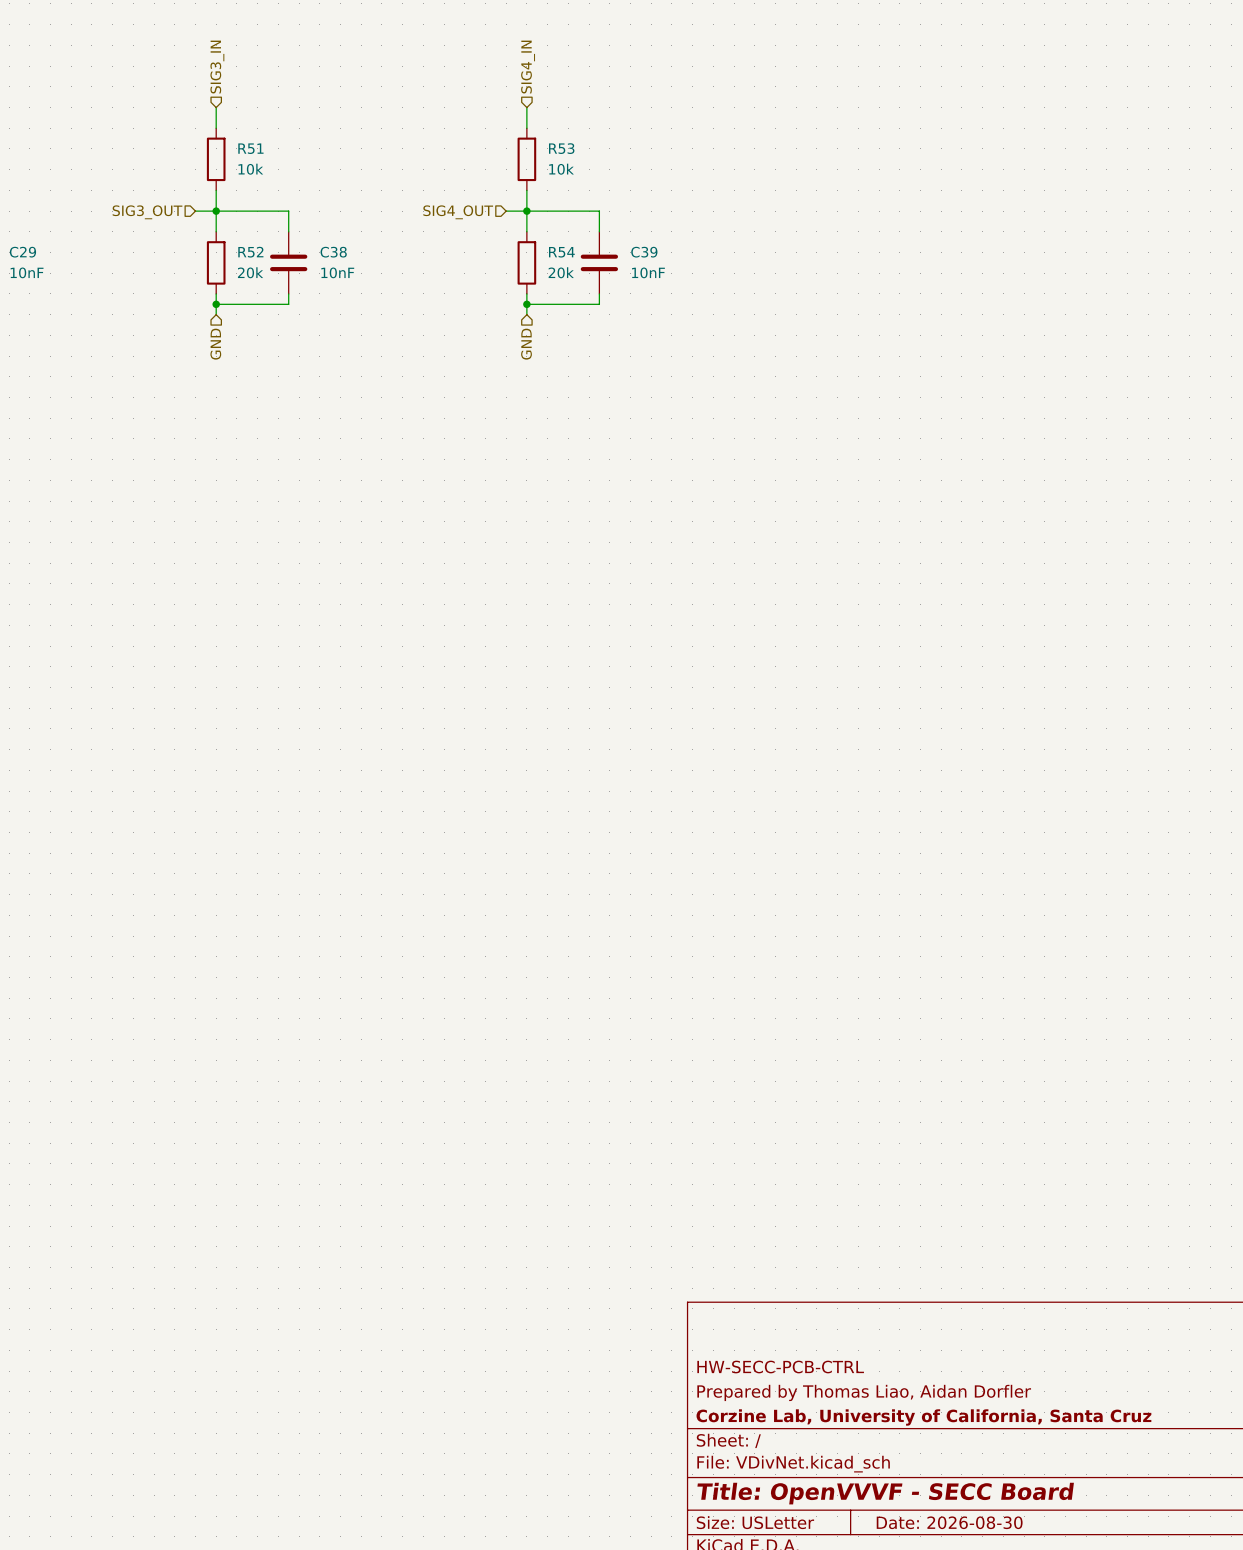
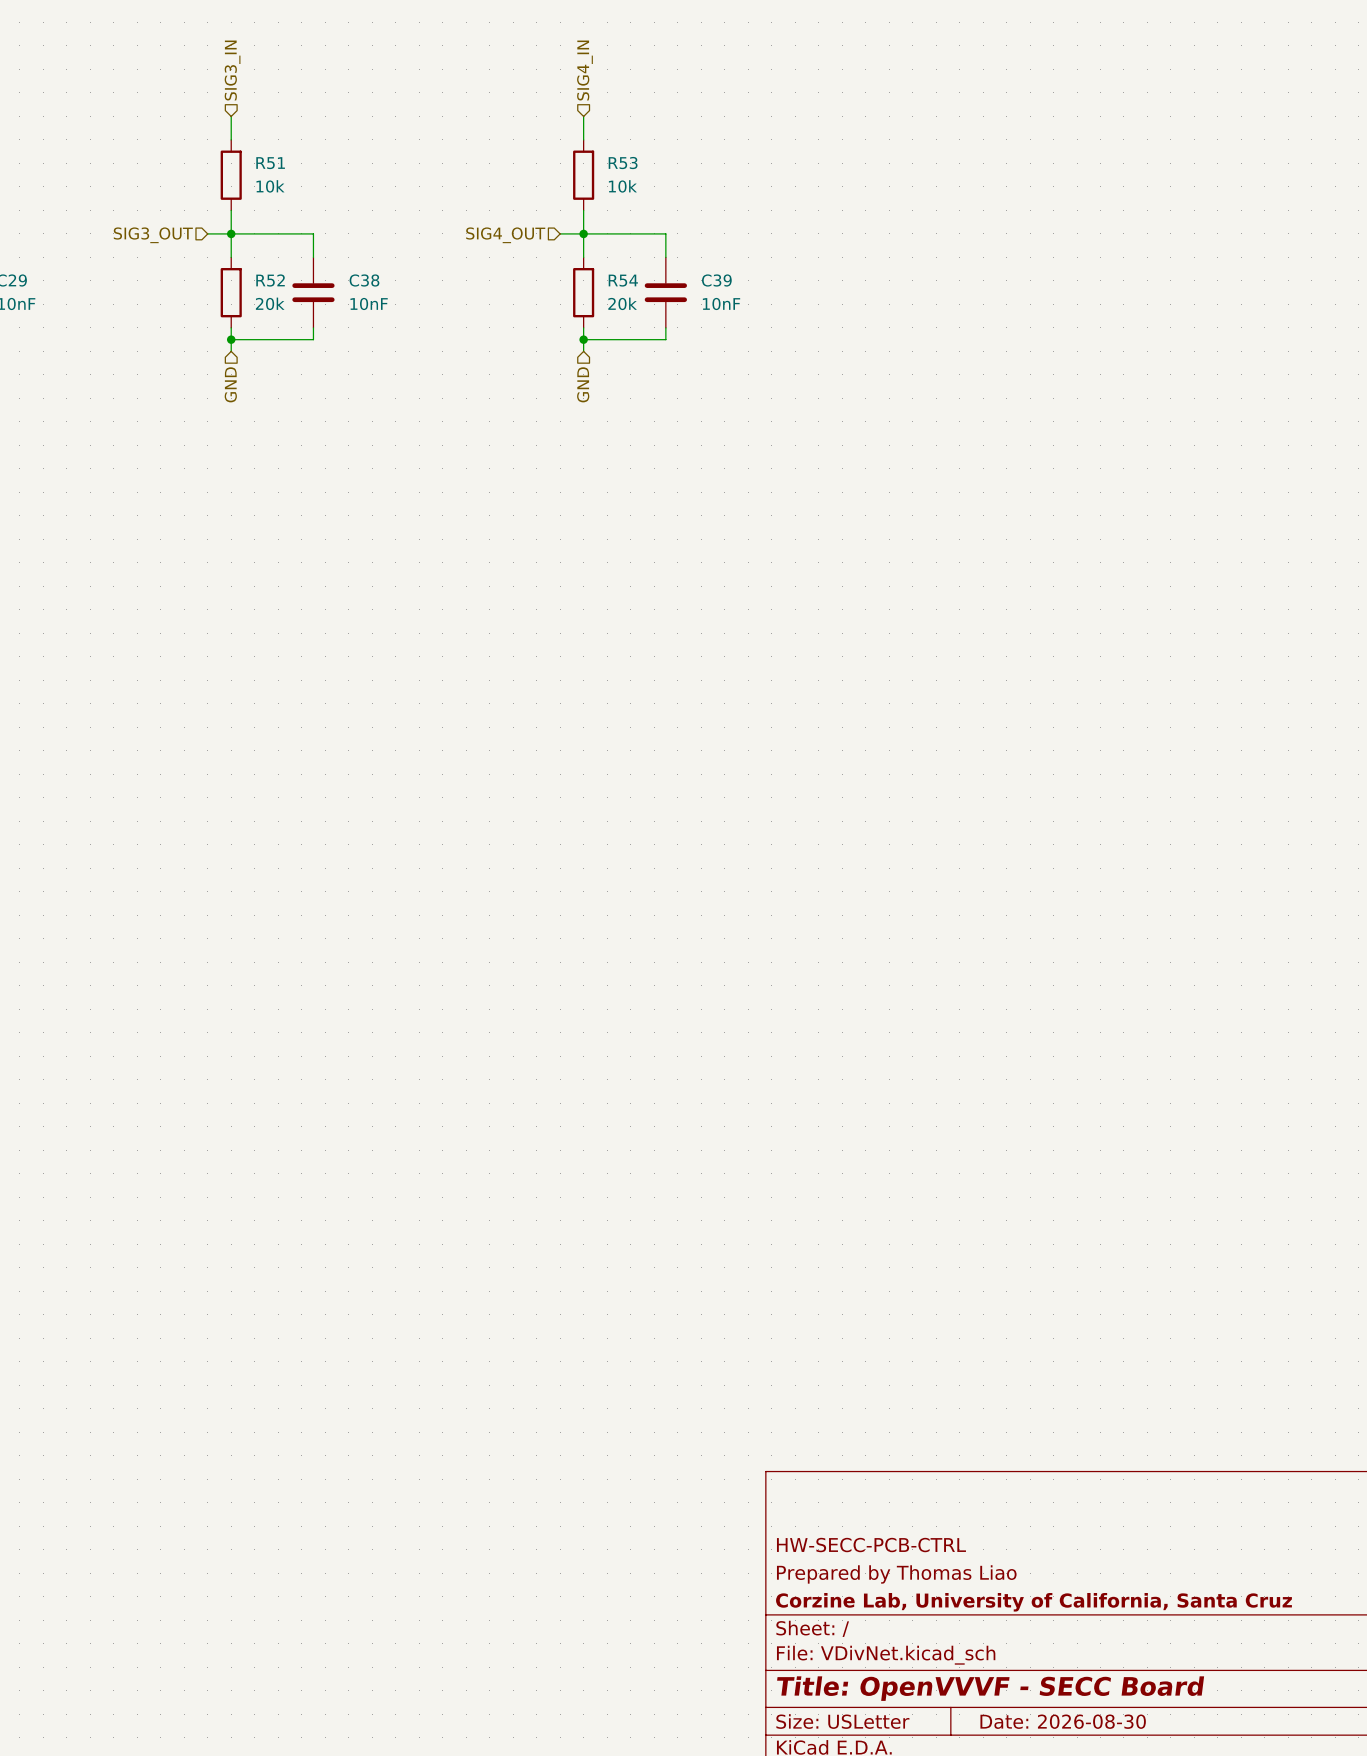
title block: Prepared by Thomas Liao, Aidan Dorfler (864, 1392) -> Prepared by Thomas Liao (896, 1574)

